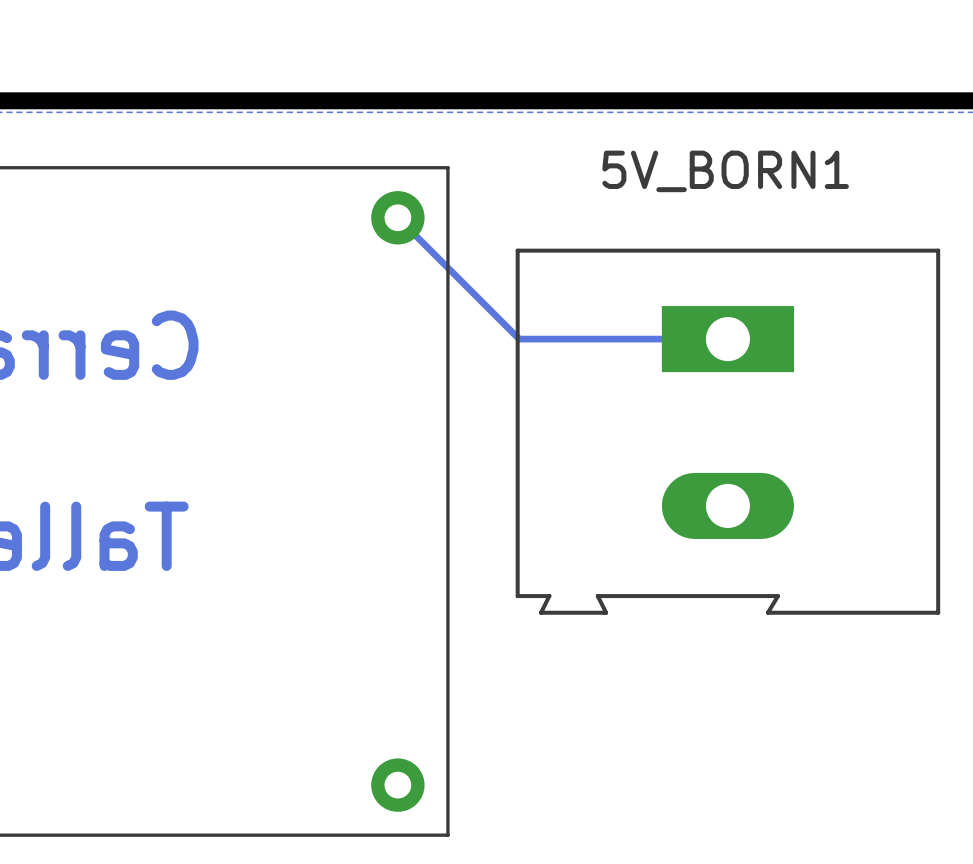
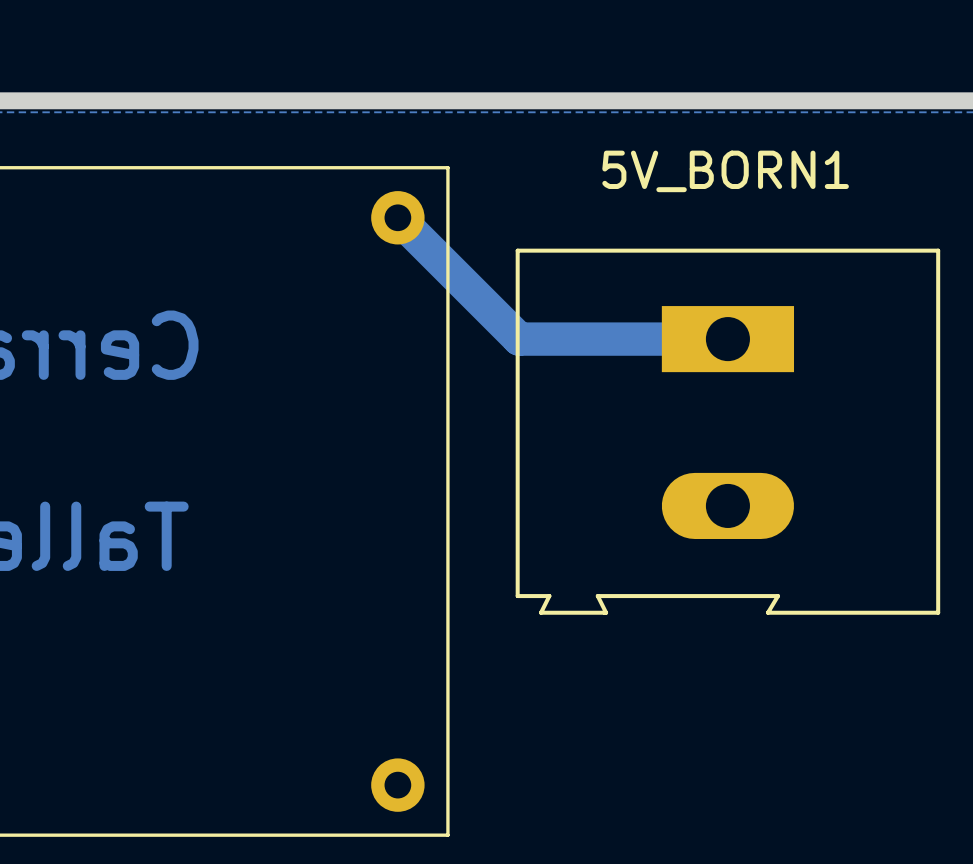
bottom track width: thin (397, 217) (519, 339) (727, 339) -> thick (397, 217) (519, 339) (727, 339)

